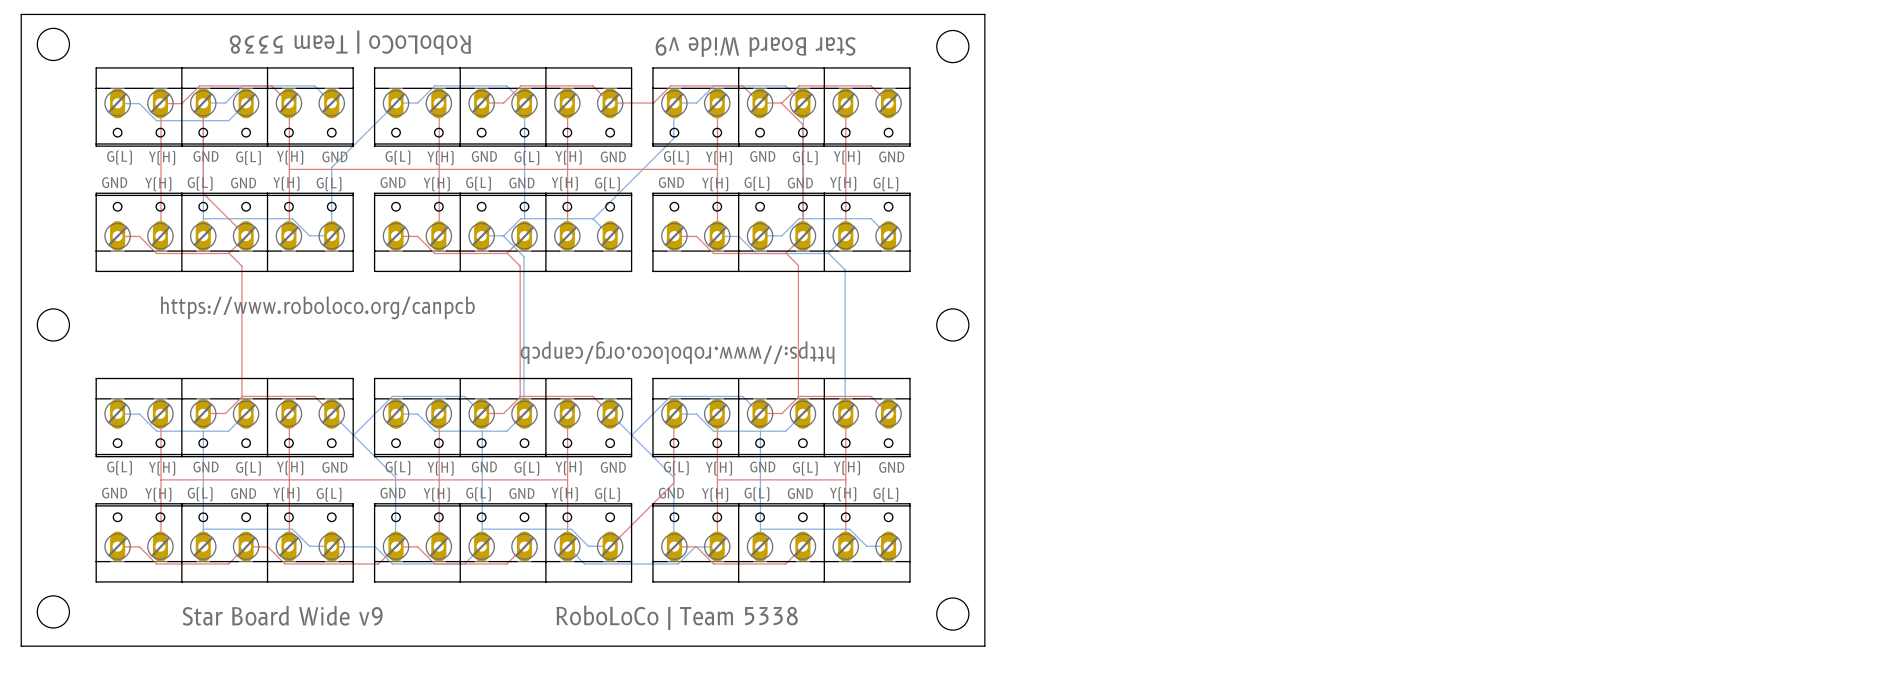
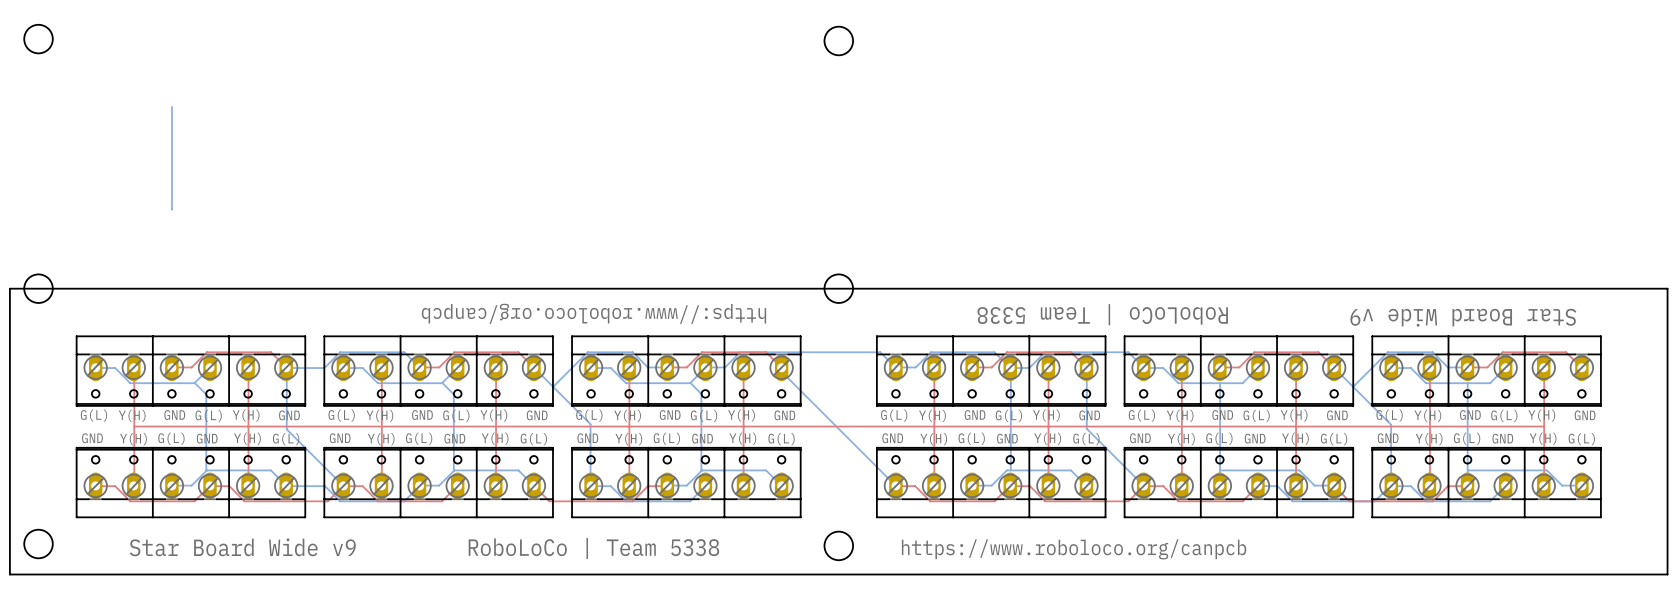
text: RoboLoCo | Team 5338 (350, 42) -> none
text: Star Board Wide v9 (755, 47) -> none
bottom track: (117, 103) (139, 103) (156, 120) (228, 120) (246, 103) -> none
top track: (203, 103) (203, 193) (246, 236) (228, 253) (156, 253) (139, 236) (117, 236) -> none
bottom track: (203, 103) (225, 103) (242, 85) (314, 85) (331, 103) -> none
top track: (438, 103) (438, 236) -> none
top track: (481, 103) (503, 103) (520, 85) (592, 85) (610, 103) (653, 103) (670, 85) (742, 85) (760, 103) (781, 103) (799, 85) (871, 85) (888, 103) -> none
top track: (567, 103) (567, 236) -> none
top track: (717, 103) (717, 236) -> none
top track: (781, 103) (802, 124) (802, 236) (785, 253) (713, 253) (696, 236) (674, 236) -> none
top track: (845, 103) (845, 236) -> none
part: (224, 107) -> none
part: (503, 107) -> none
part: (781, 107) -> none
top track: (289, 169) (717, 169) -> none
bottom track: (203, 218) (292, 218) (309, 235) (331, 236) (331, 167) (396, 103) (417, 103) (434, 85) (506, 85) (524, 103) (524, 218) -> none
bottom track: (803, 218) (803, 103) (785, 85) (713, 85) (696, 103) (673, 103) (673, 138) (593, 219) -> none
part: (224, 232) -> none
part: (503, 232) -> none
part: (781, 232) -> none
bottom track: (503, 235) (523, 256) (524, 413) -> none
top track: (160, 236) (160, 103) (181, 103) (199, 85) (271, 85) (289, 103) (288, 236) -> none
top track: (396, 236) (417, 236) (434, 253) (506, 253) (524, 236) -> none
bottom track: (481, 236) (503, 235) (520, 218) (592, 218) (610, 236) -> none
bottom track: (717, 236) (738, 236) (756, 253) (828, 253) (845, 236) -> none
bottom track: (760, 236) (781, 235) (799, 218) (871, 218) (888, 236) -> none
top track: (228, 253) (241, 266) (242, 396) -> none
top track: (507, 253) (520, 266) (520, 396) -> none
top track: (786, 253) (798, 265) (798, 396) -> none
bottom track: (828, 253) (845, 269) (845, 413) -> none
text: https://www.roboloco.org/canpcb (317, 307) -> none
board edge: (21, 324) (21, 14) (984, 14) (984, 646) -> (9, 288) (1667, 288) (1667, 574) (867, 574)
text: none -> RoboLoCo | Team 5338 (1102, 314)
text: none -> Star Board Wide v9 (1463, 317)
bottom track: (721, 396) (742, 396) (759, 413) -> (632, 352) (647, 367) (667, 367)
top track: (674, 413) (673, 483) (610, 546) -> none
bottom track: none -> (705, 367) (725, 367) (740, 352) (880, 352) (895, 367) (915, 367) (930, 352) (994, 352) (1010, 367)
bottom track: none -> (781, 367) (781, 371) (895, 485)
top track: none -> (934, 367) (934, 485)
top track: none -> (972, 367) (991, 367) (1006, 352) (1071, 352) (1086, 367)
bottom track: none -> (1010, 367) (1010, 470)
bottom track: none -> (1010, 367) (1029, 368) (1045, 352) (1128, 352) (1143, 367) (1163, 368) (1178, 383) (1242, 383) (1257, 367)
top track: none -> (1048, 367) (1048, 485)
bottom track: none -> (1086, 367) (1086, 428) (1143, 485)
top track: none -> (1181, 367) (1181, 485)
top track: none -> (1219, 367) (1239, 367) (1254, 352) (1318, 352) (1334, 367)
top track: none -> (1296, 367) (1296, 485)
bottom track: none -> (1334, 367) (1391, 424) (1391, 485)
bottom track: none -> (1391, 367) (1410, 368) (1426, 383) (1490, 383) (1505, 367)
top track: none -> (1429, 367) (1429, 485)
top track: none -> (1467, 367) (1487, 367) (1502, 352) (1566, 352) (1581, 367)
bottom track: none -> (1467, 367) (1447, 367) (1432, 352) (1387, 352) (1353, 386)
top track: none -> (1543, 367) (1543, 485)
bottom track: (332, 414) (395, 477) (395, 546) -> (286, 368) (286, 429) (343, 485)
bottom track: (374, 414) (353, 435) -> (324, 368) (286, 367)
part: none -> (991, 371)
part: none -> (1238, 371)
part: none -> (1486, 371)
bottom track: none -> (194, 382) (206, 394) (206, 470)
bottom track: none -> (442, 382) (453, 394) (454, 470)
bottom track: none -> (690, 382) (701, 393) (701, 470)
bottom track: (203, 431) (203, 546) -> none
bottom track: (482, 431) (482, 546) -> none
bottom track: (760, 431) (760, 546) -> none
bottom track: none -> (1220, 383) (1219, 485)
bottom track: none -> (1467, 383) (1467, 485)
top track: none -> (496, 426) (629, 426)
top track: none -> (743, 426) (1544, 426)
bottom track: (203, 529) (242, 529) -> (171, 485) (191, 485) (206, 470)
bottom track: (292, 529) (309, 546) (331, 546) -> (251, 470) (270, 470) (286, 485)
bottom track: (482, 529) (520, 529) -> (420, 485) (439, 485) (454, 470)
bottom track: (571, 529) (588, 546) (609, 546) -> (499, 470) (518, 470) (533, 485)
bottom track: (760, 529) (799, 529) -> (667, 485) (686, 485) (701, 470)
bottom track: (849, 529) (866, 546) (888, 546) -> (746, 470) (766, 470) (781, 485)
bottom track: none -> (1220, 470) (1299, 470) (1314, 485) (1334, 485)
bottom track: none -> (1467, 470) (1546, 470) (1562, 485) (1581, 485)
part: none -> (991, 482)
part: none -> (1238, 482)
part: none -> (1486, 482)
bottom track: (567, 546) (584, 563) (678, 563) (695, 546) -> (591, 485) (609, 486)
top track: (674, 546) (696, 546) (713, 563) -> (533, 485) (549, 501) (626, 501)
bottom track: (717, 546) (696, 546) -> (705, 485) (690, 501) (626, 501) (610, 486)
top track: (802, 546) (785, 563) (721, 563) -> (667, 485) (647, 486) (632, 501)
top track: none -> (895, 485) (915, 486) (930, 501) (994, 501) (1010, 485) (1029, 486) (1045, 501) (1128, 501) (1143, 485) (1163, 486) (1178, 501) (1242, 501) (1257, 485)
bottom track: none -> (972, 485) (991, 485) (1006, 470) (1071, 470) (1086, 485)
bottom track: none -> (1257, 485) (1277, 486) (1292, 501) (1374, 501) (1391, 485)
top track: none -> (1334, 485) (1349, 501) (1432, 501) (1447, 486) (1467, 485)
bottom track: none -> (1391, 485) (1410, 486) (1426, 501) (1490, 501) (1505, 485)
text: none -> https://www.roboloco.org/canpcb (1074, 549)

